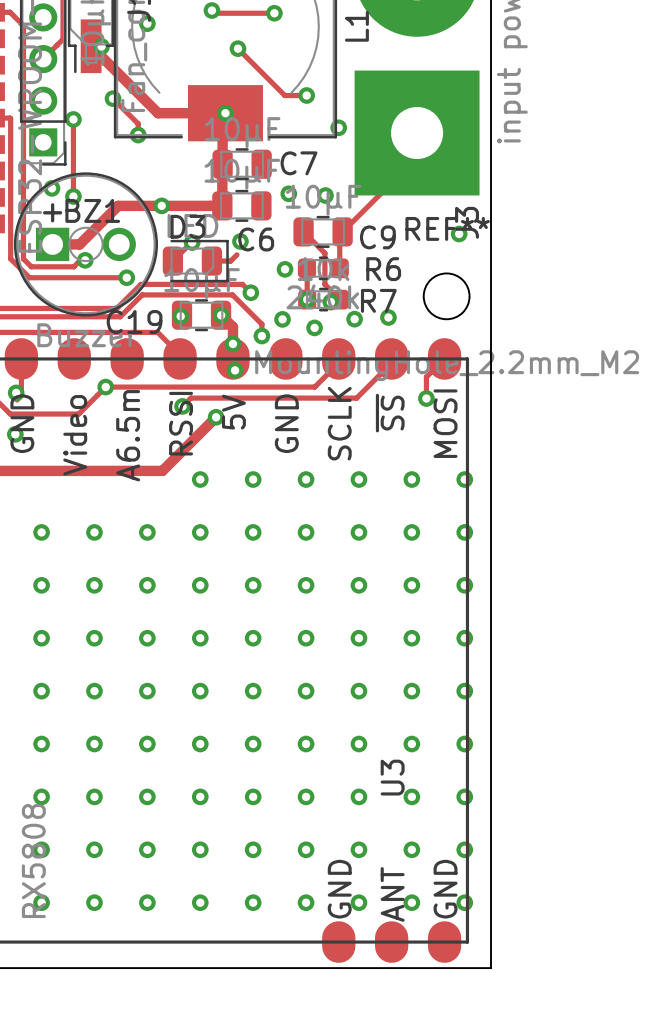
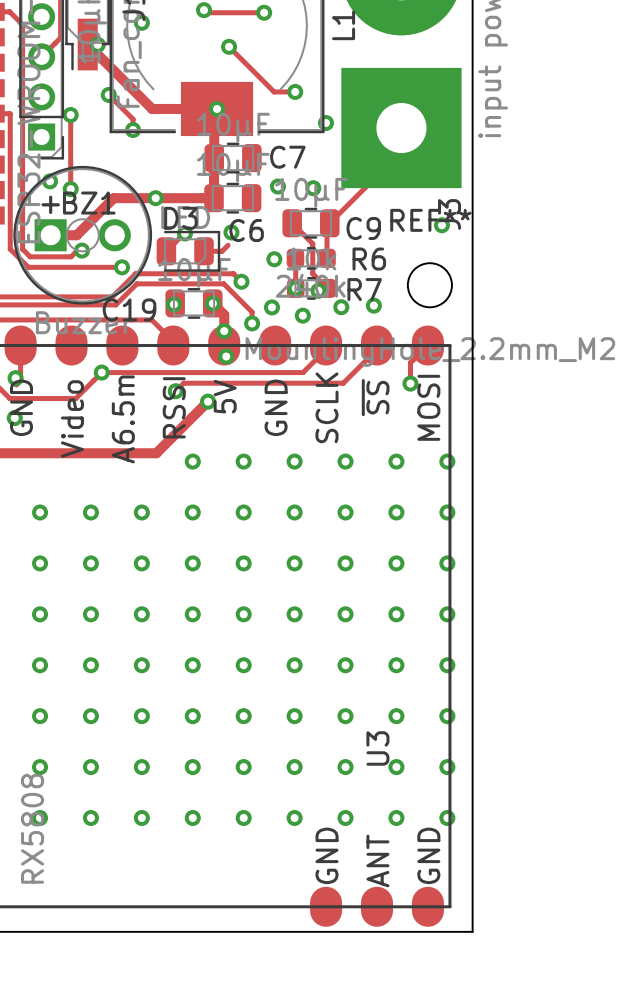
via: (41, 902) -> none
via: (94, 902) -> none
via: (147, 902) -> none
via: (200, 902) -> none
via: (253, 902) -> none
via: (306, 902) -> none
via: (358, 902) -> none
via: (411, 902) -> none
via: (464, 902) -> none

